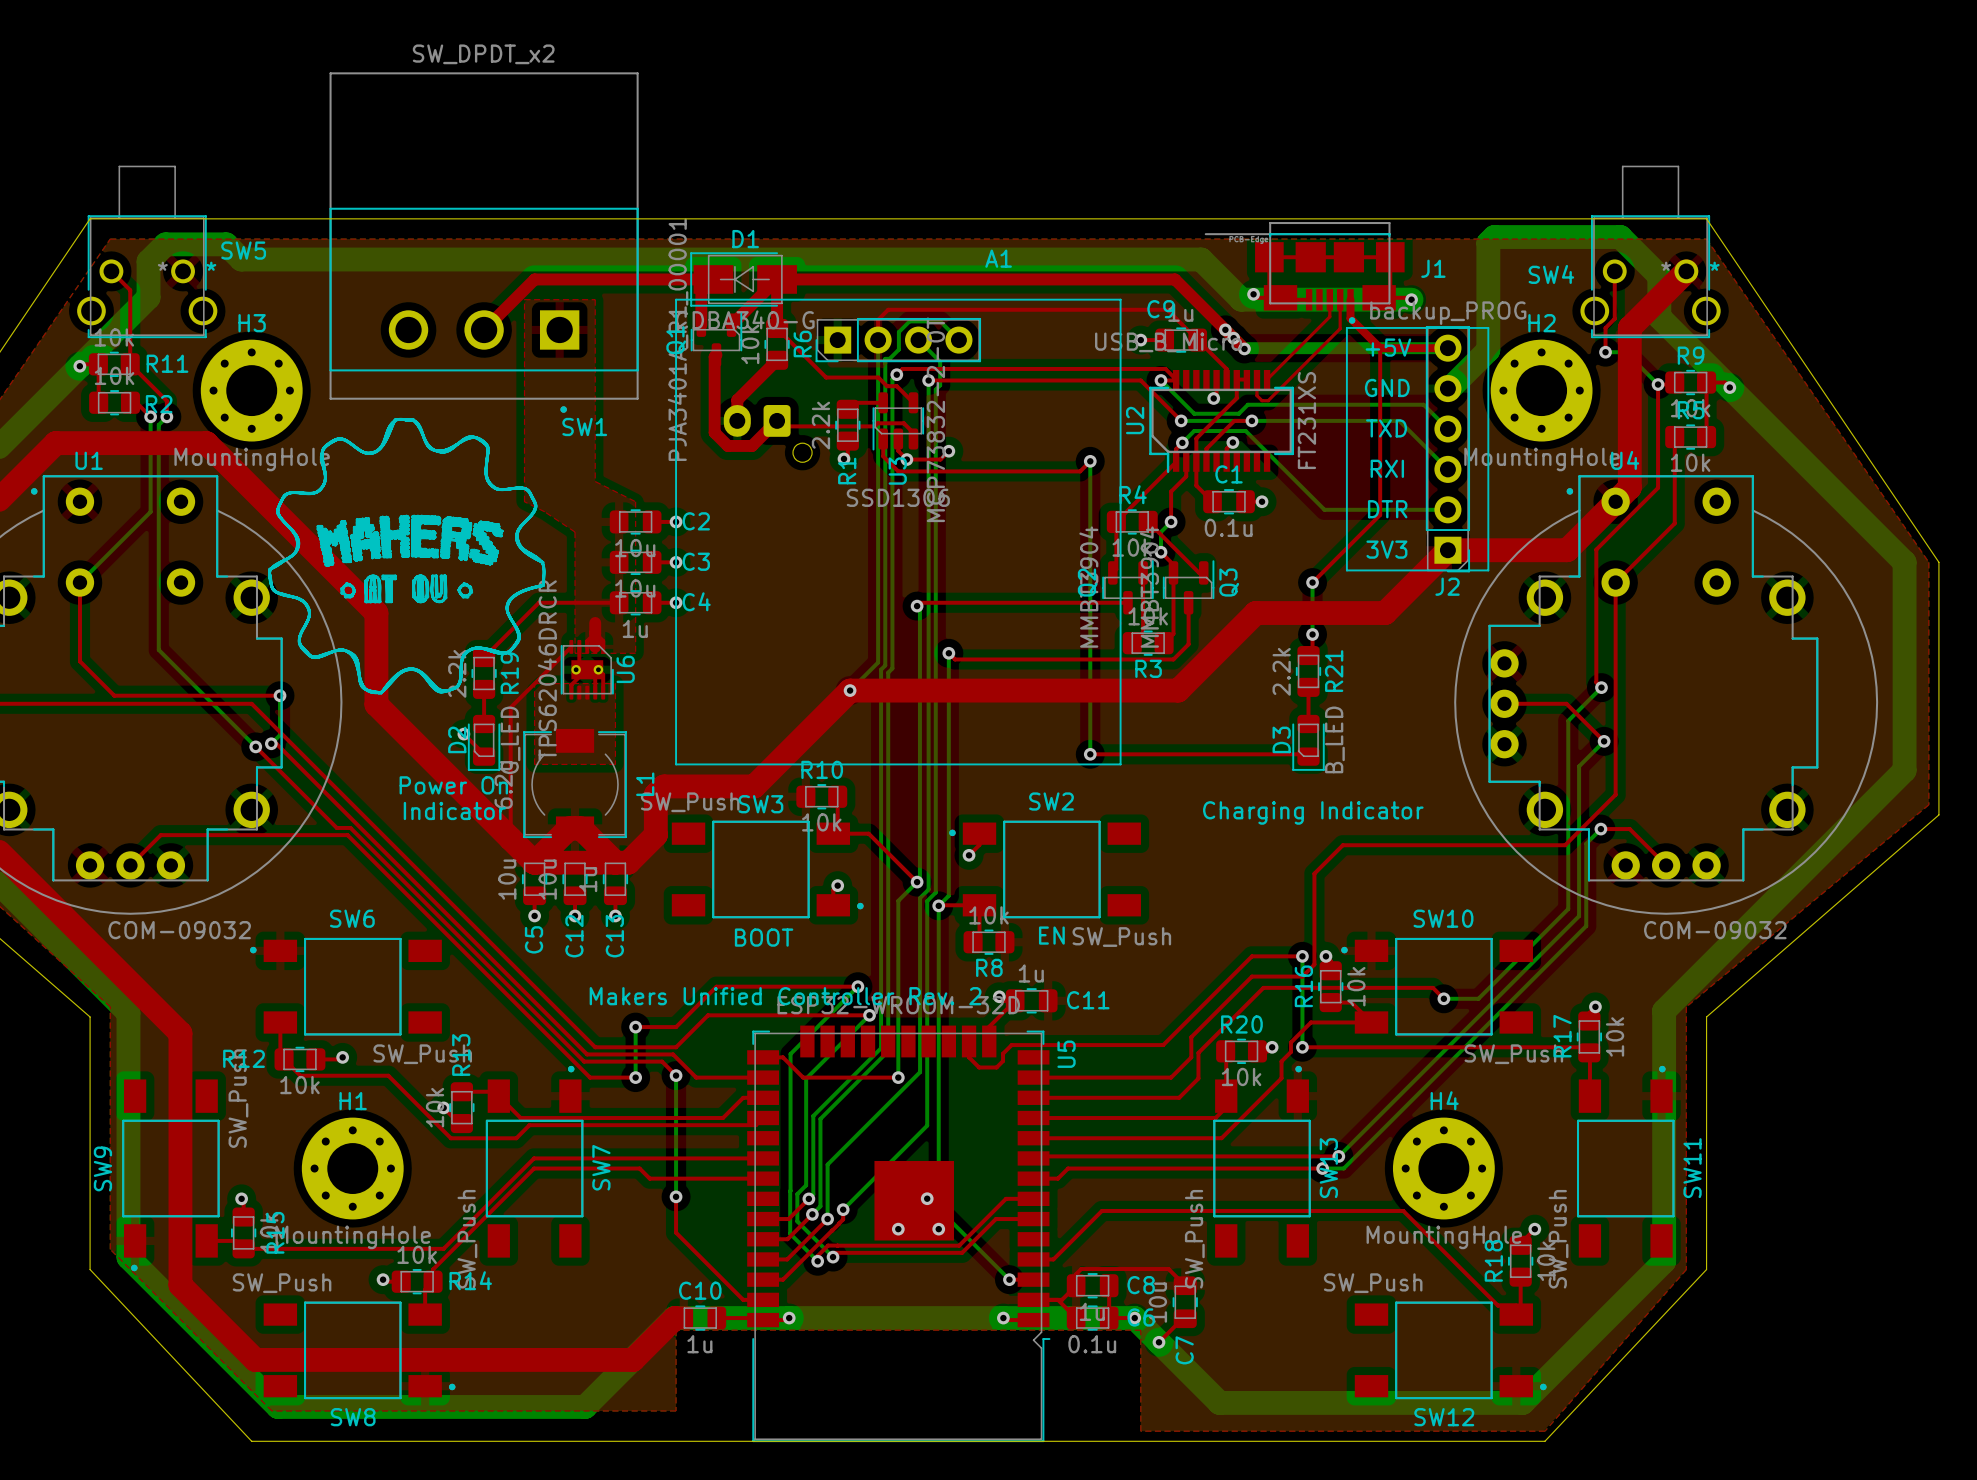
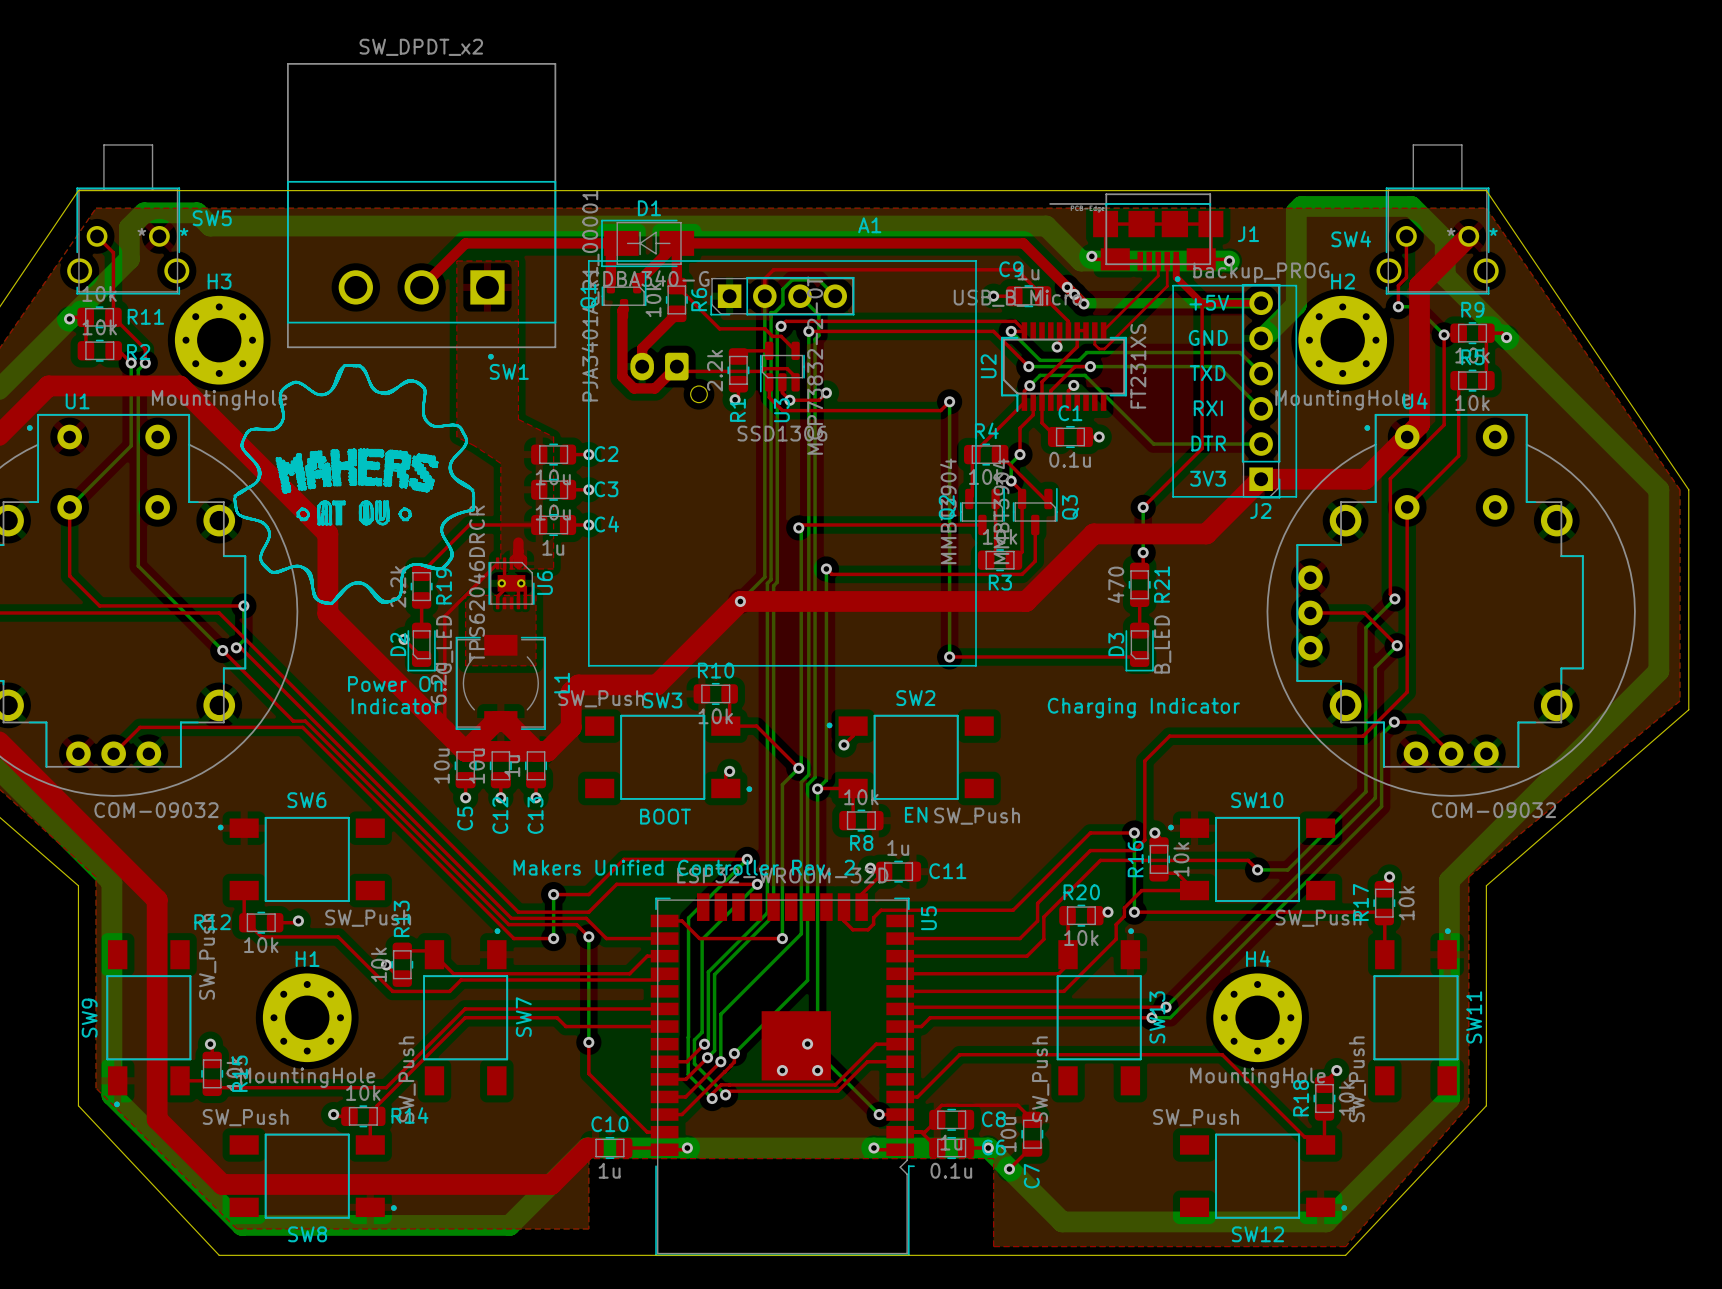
R21 value: 2.2k (1281, 671) -> 470 (1115, 584)

